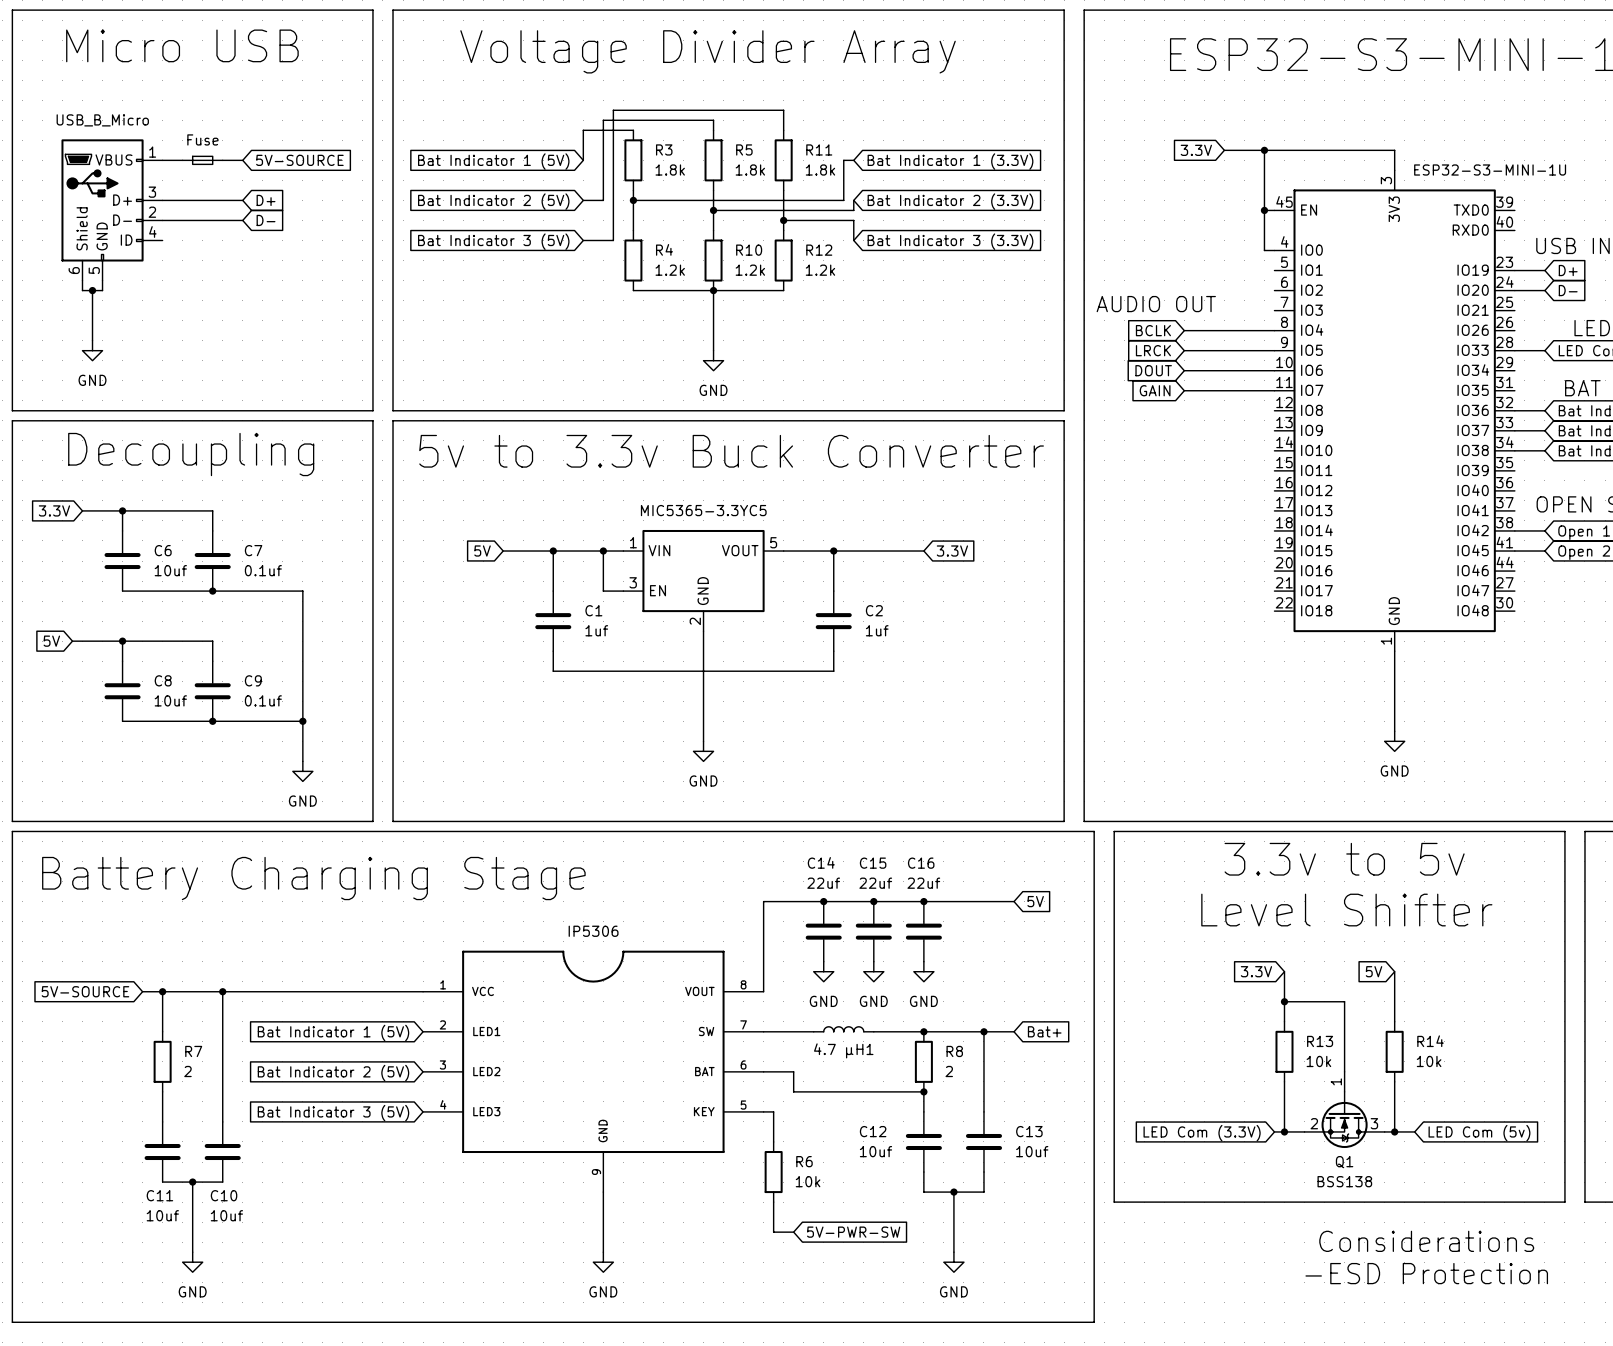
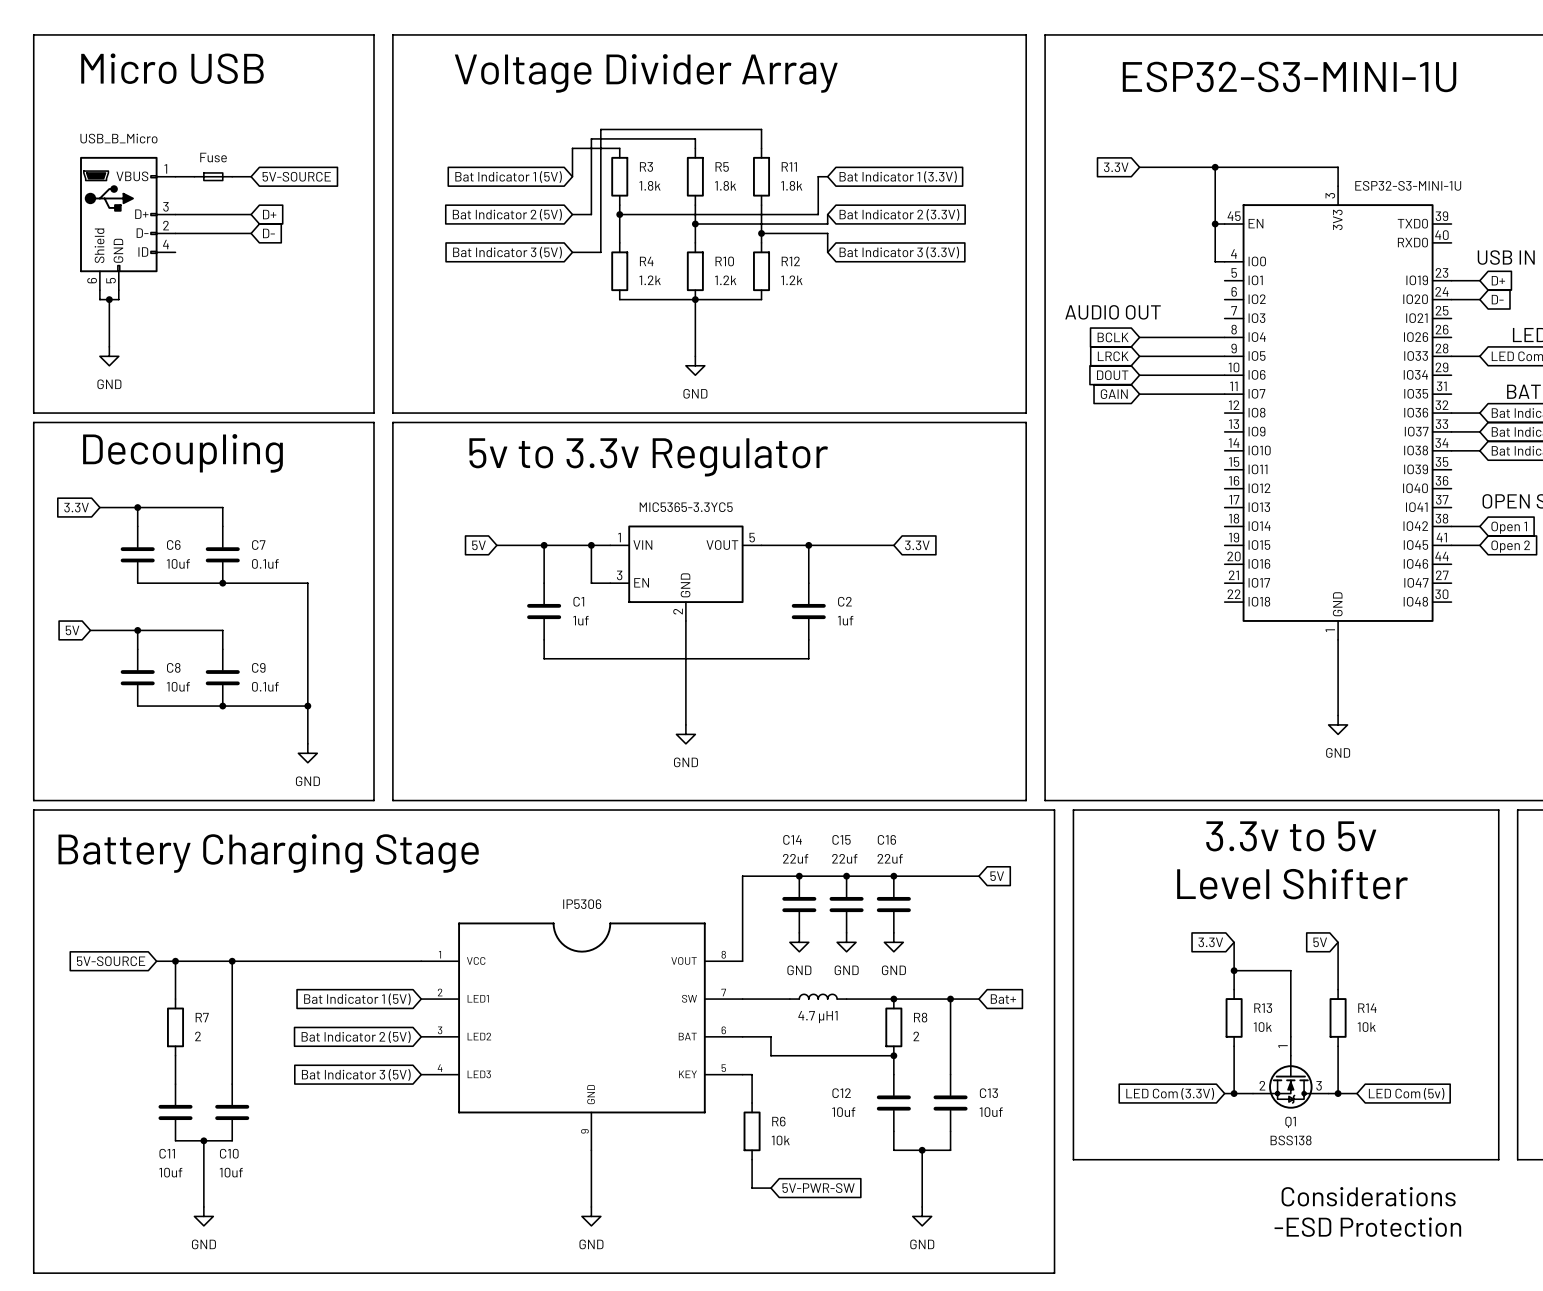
wire: none -> (1139, 167) (1177, 167)
global label position: 3.3V (1196, 150) -> 3.3V (1116, 167)
text: 5v to 3.3v Buck Converter (731, 451) -> 5v to 3.3v Regulator (648, 457)

